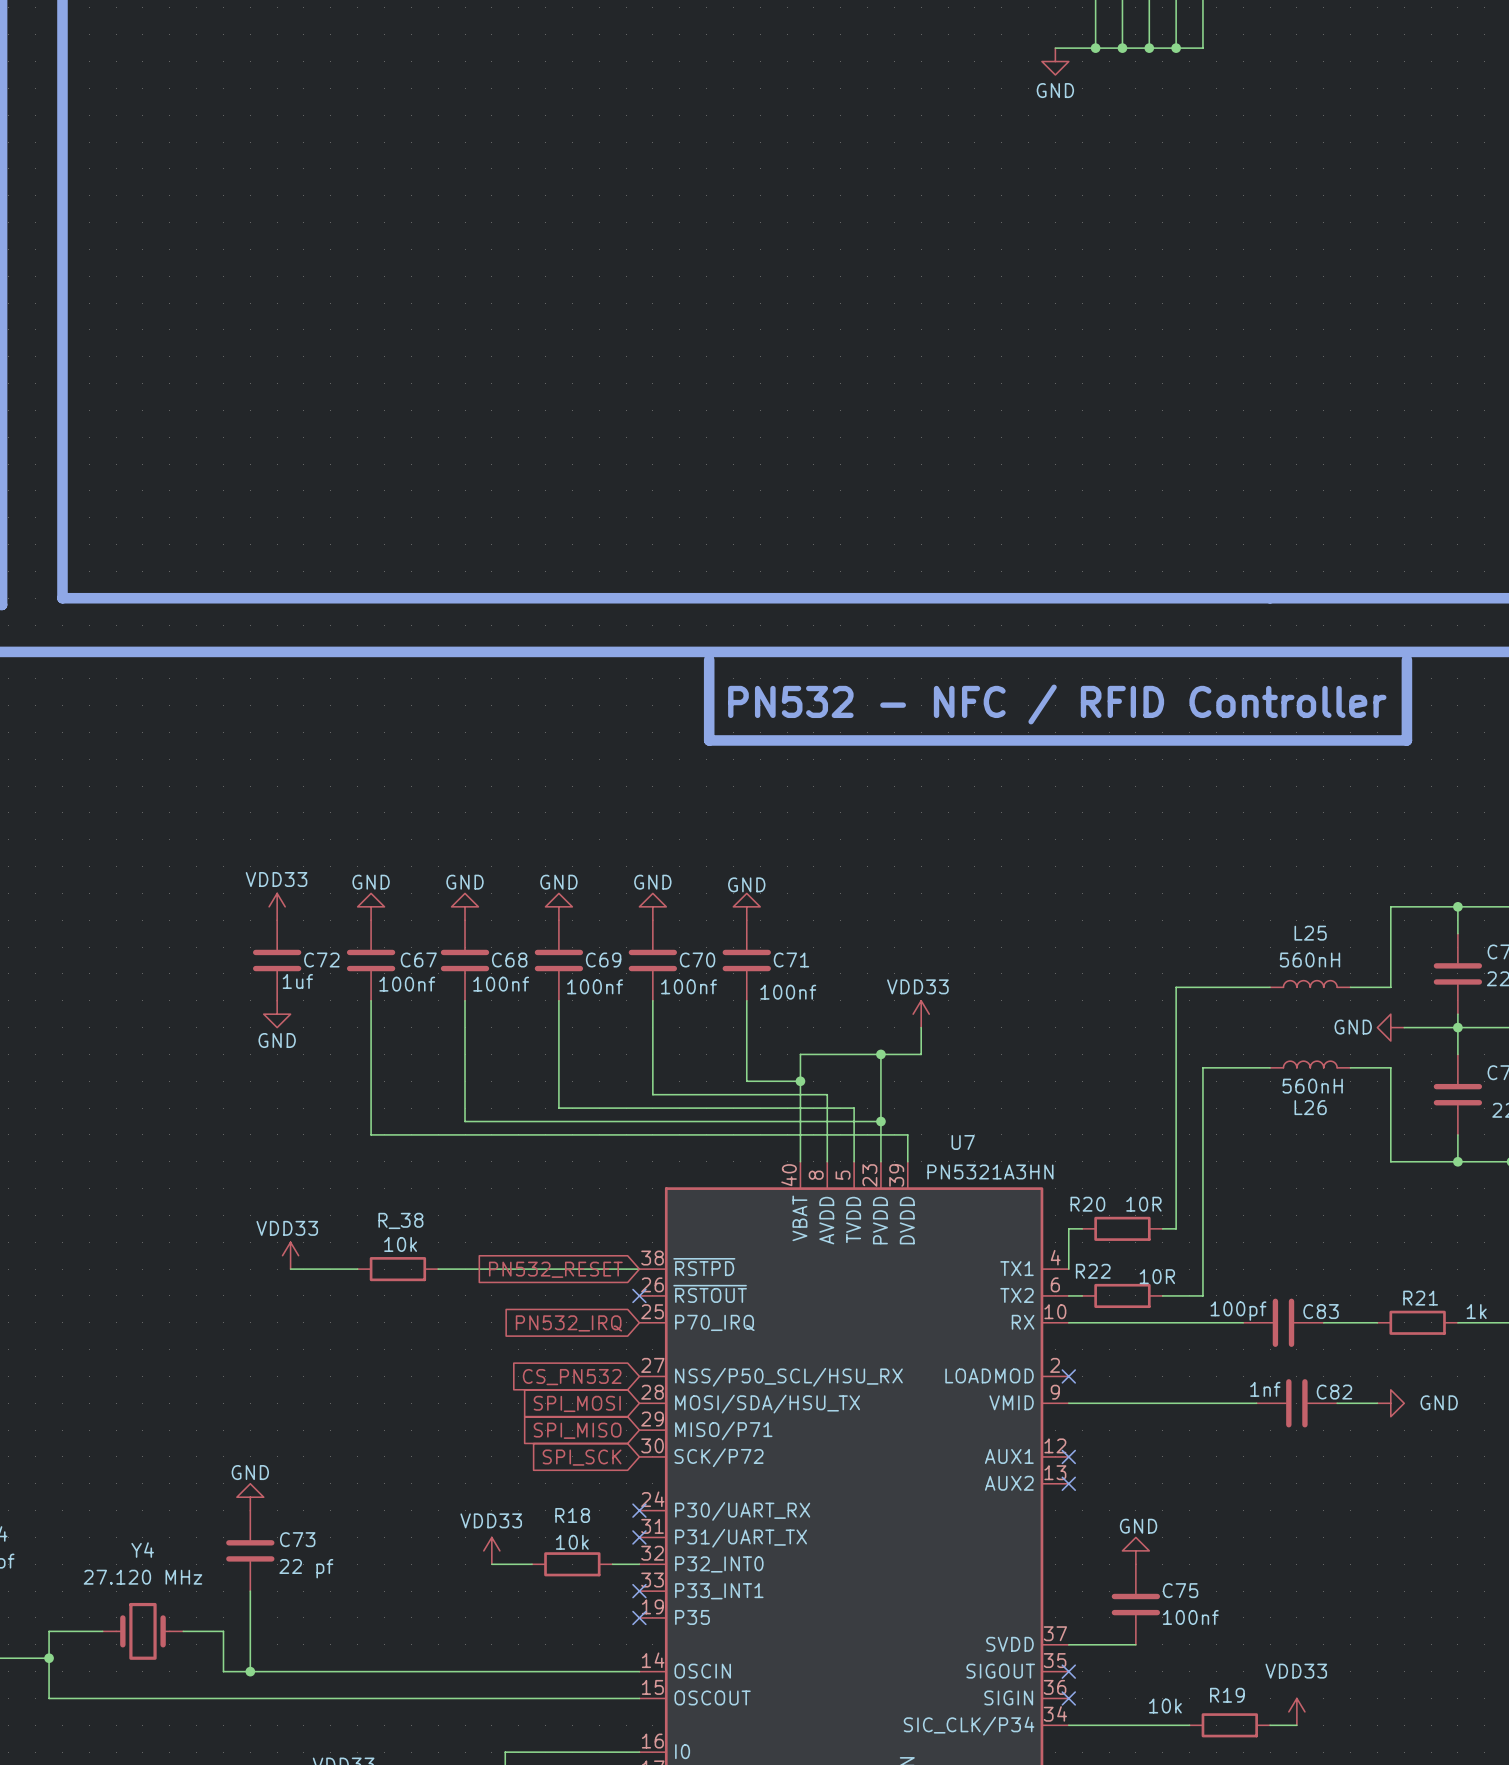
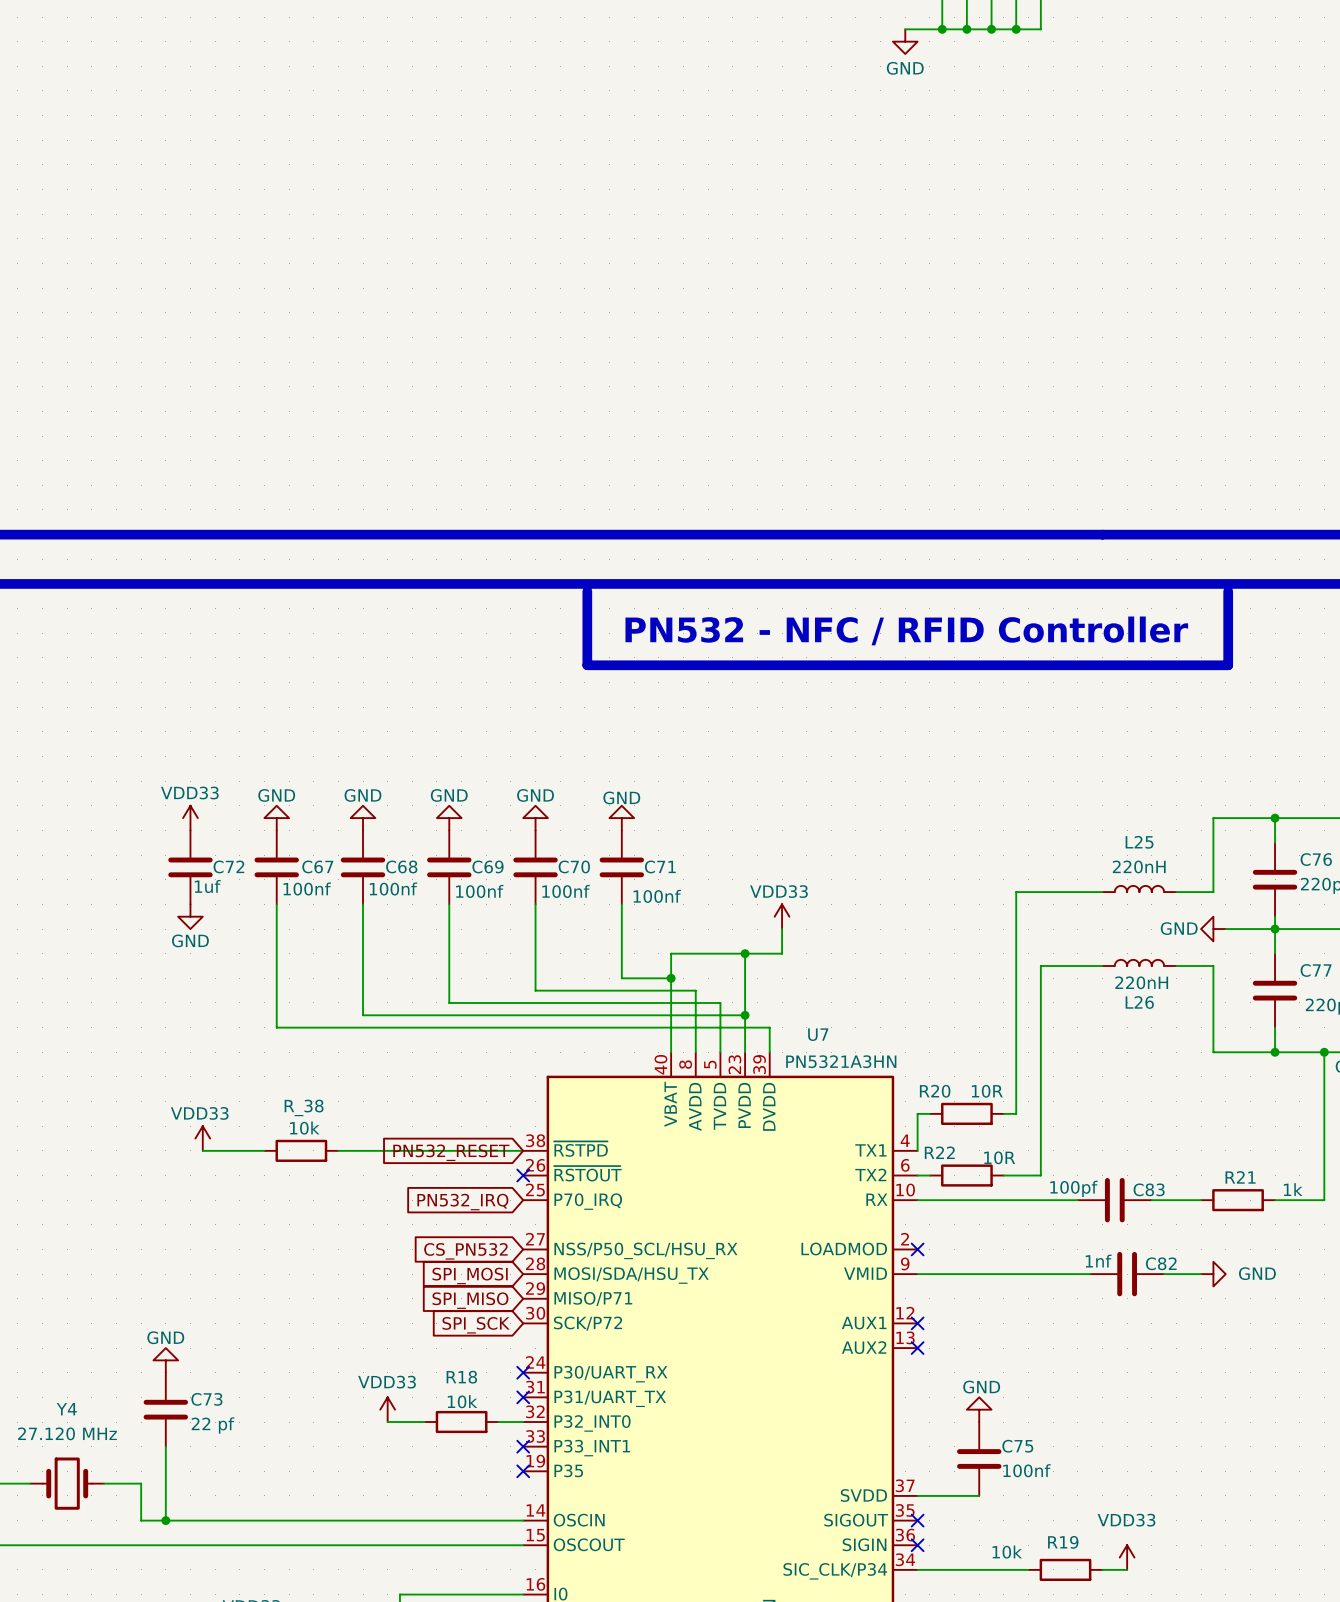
L25 value: 560nH (1309, 960) -> 220nH (1139, 866)
L26 value: 560nH (1312, 1086) -> 220nH (1141, 982)

